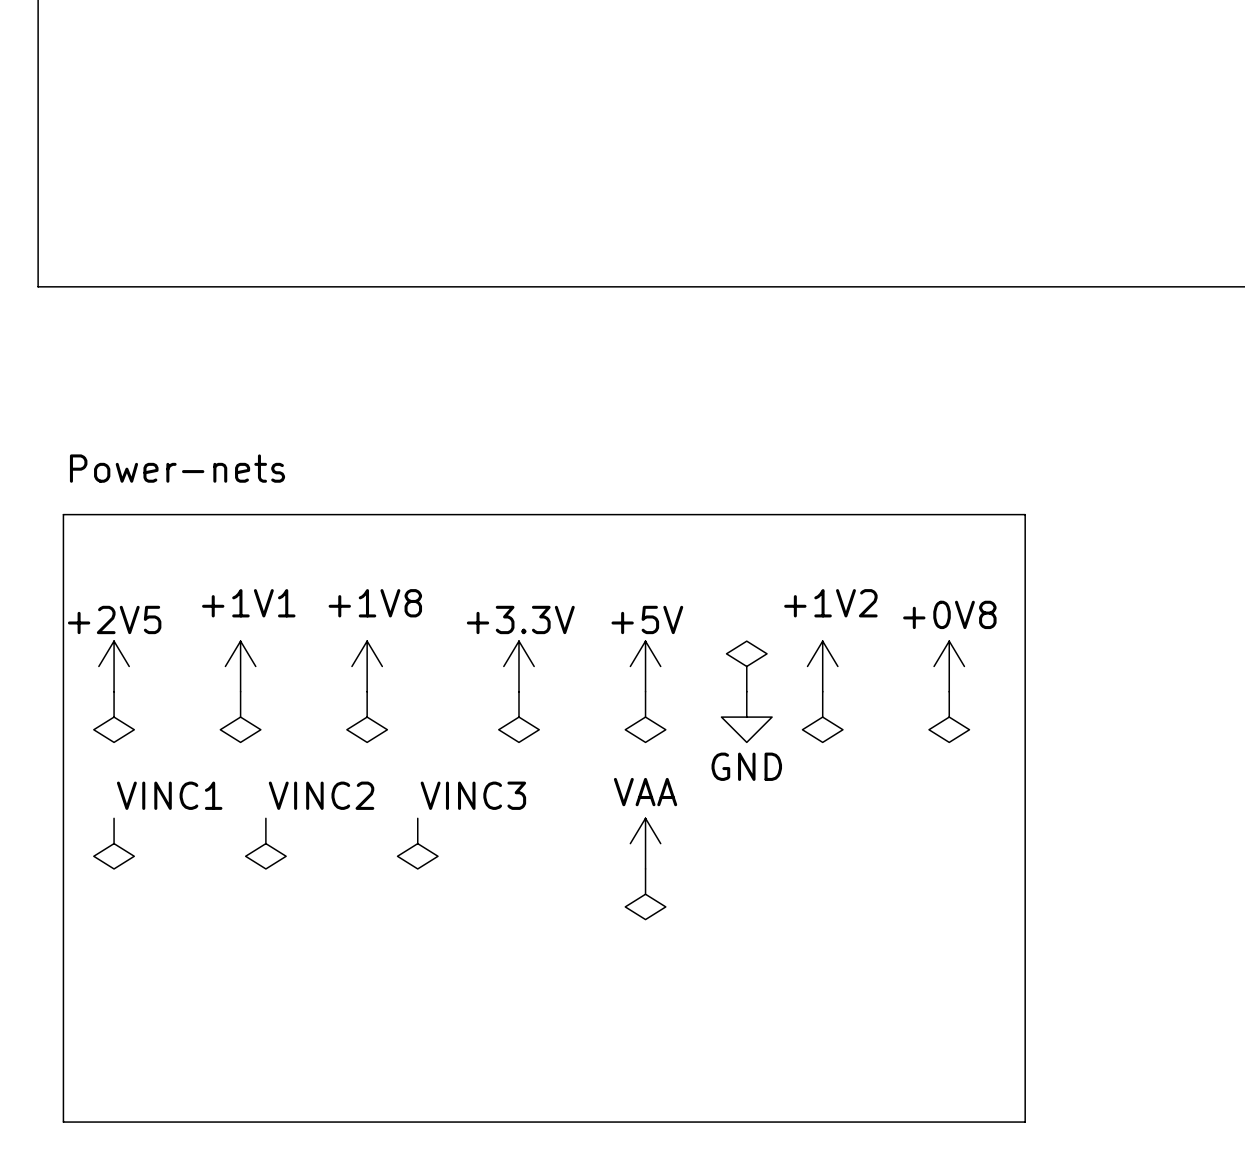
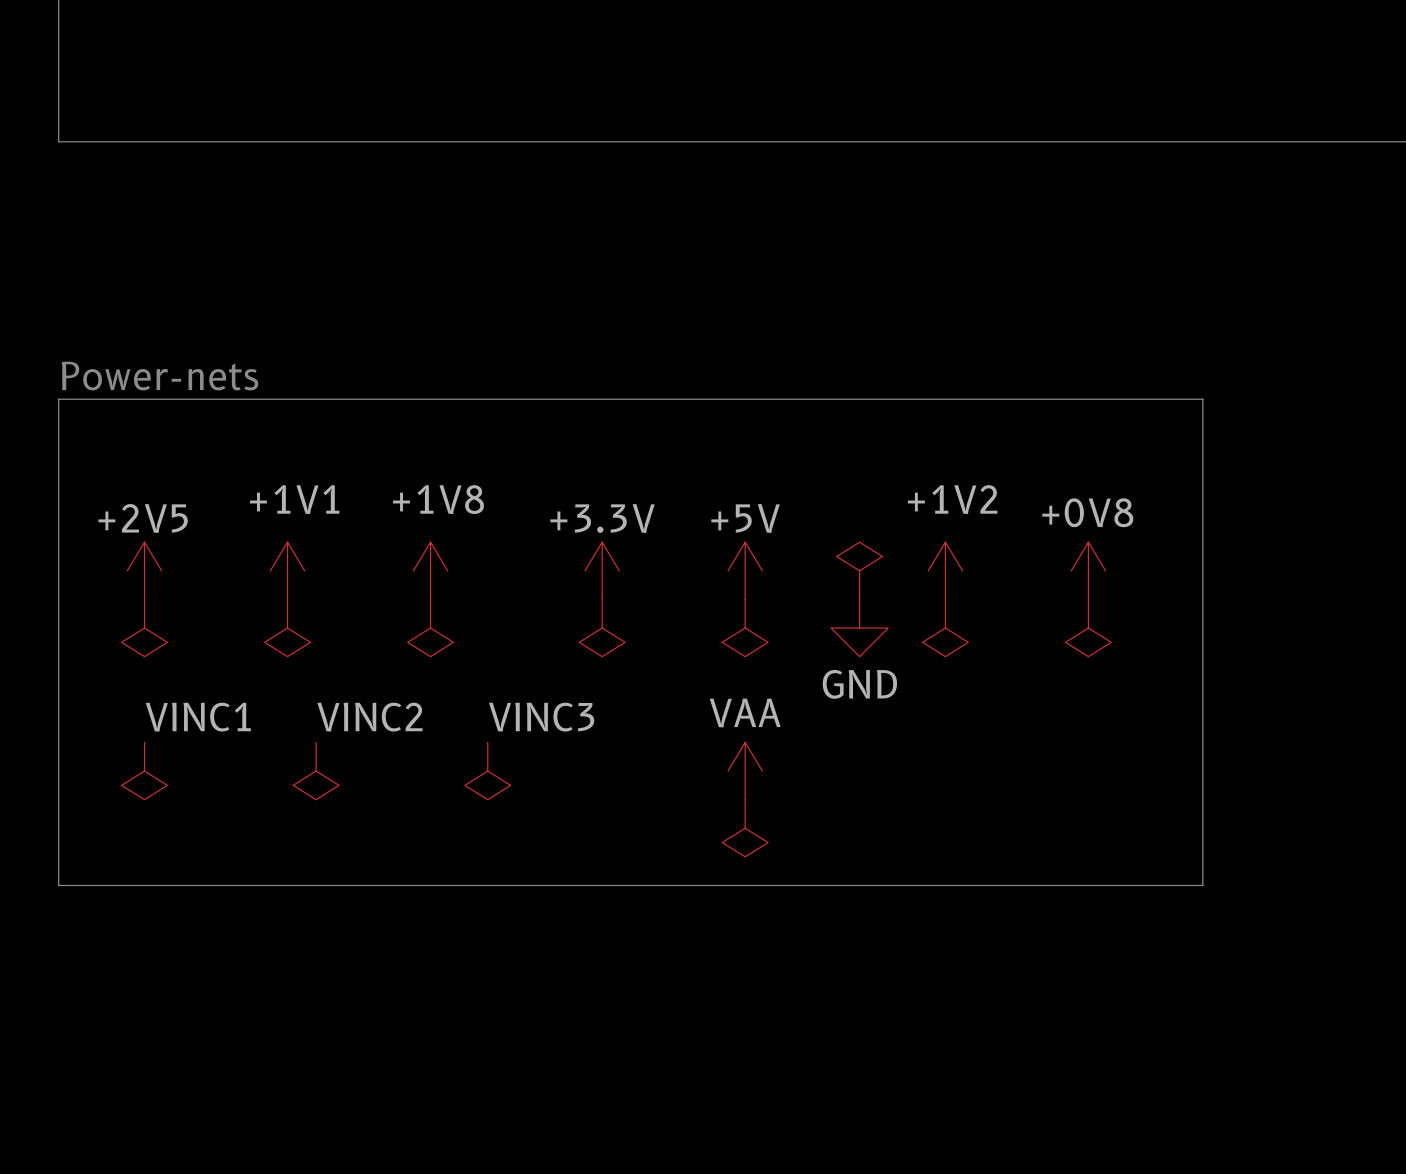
text position: Power-nets (177, 468) -> Power-nets (159, 376)
line: (63, 514) (63, 1122) (1025, 1122) (1025, 514) -> (87, 399) (58, 399) (58, 885) (1202, 885) (1202, 399) (1174, 399)

